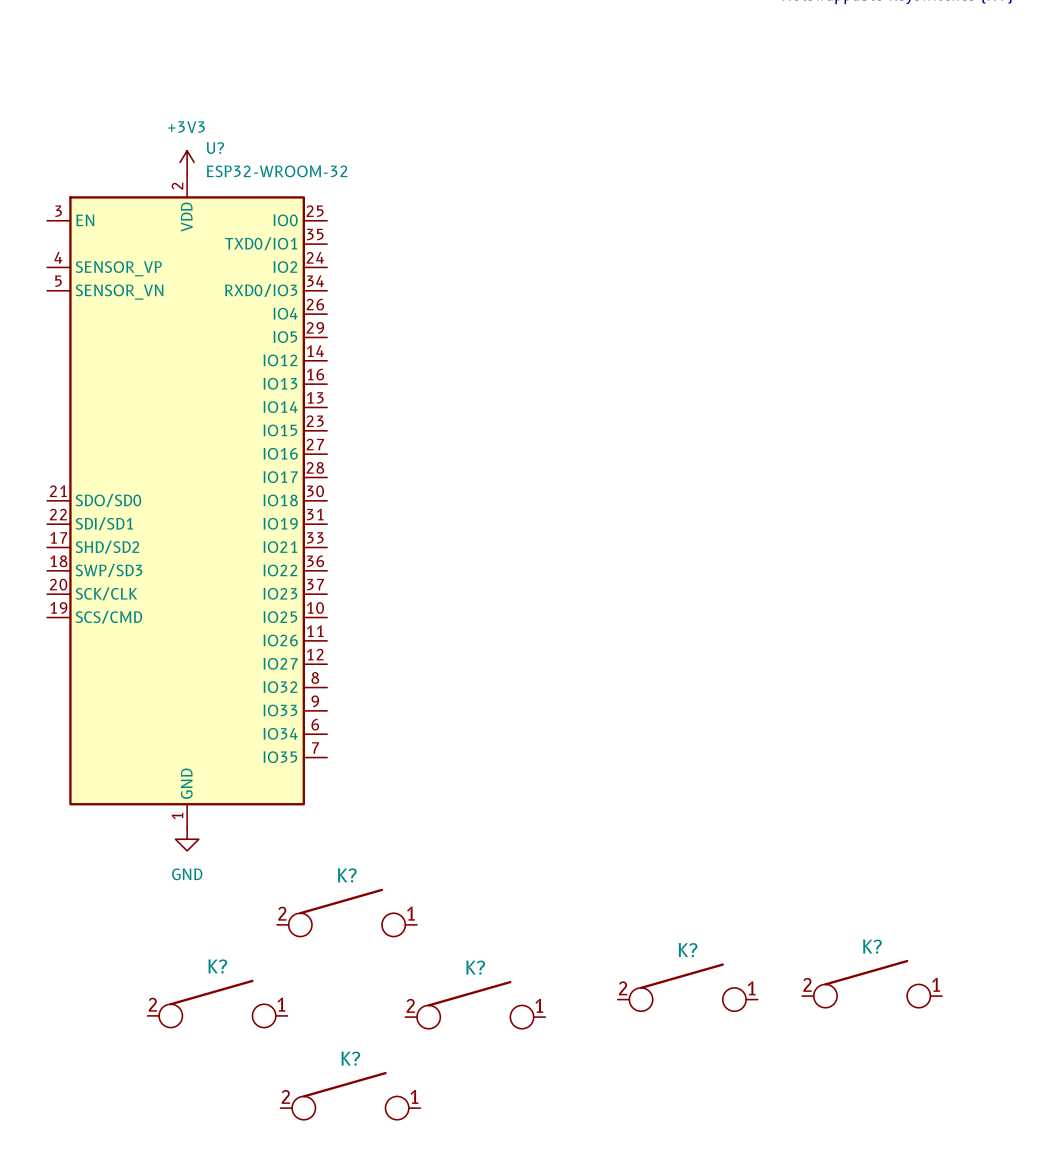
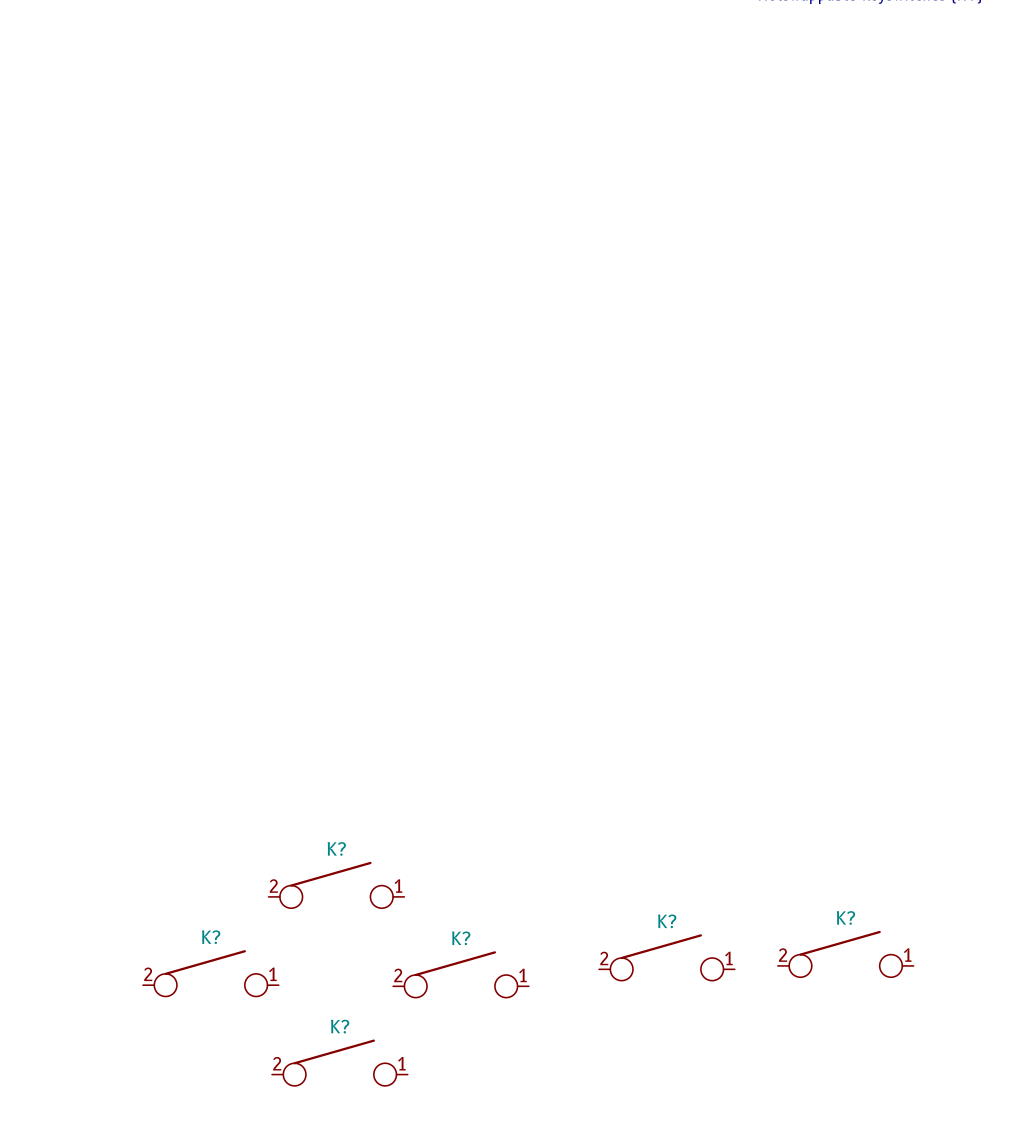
power symbol: +3V3 (187, 162) -> none
U?: ESP32-WROOM-32 (187, 500) -> none
power symbol: GND (187, 839) -> none

